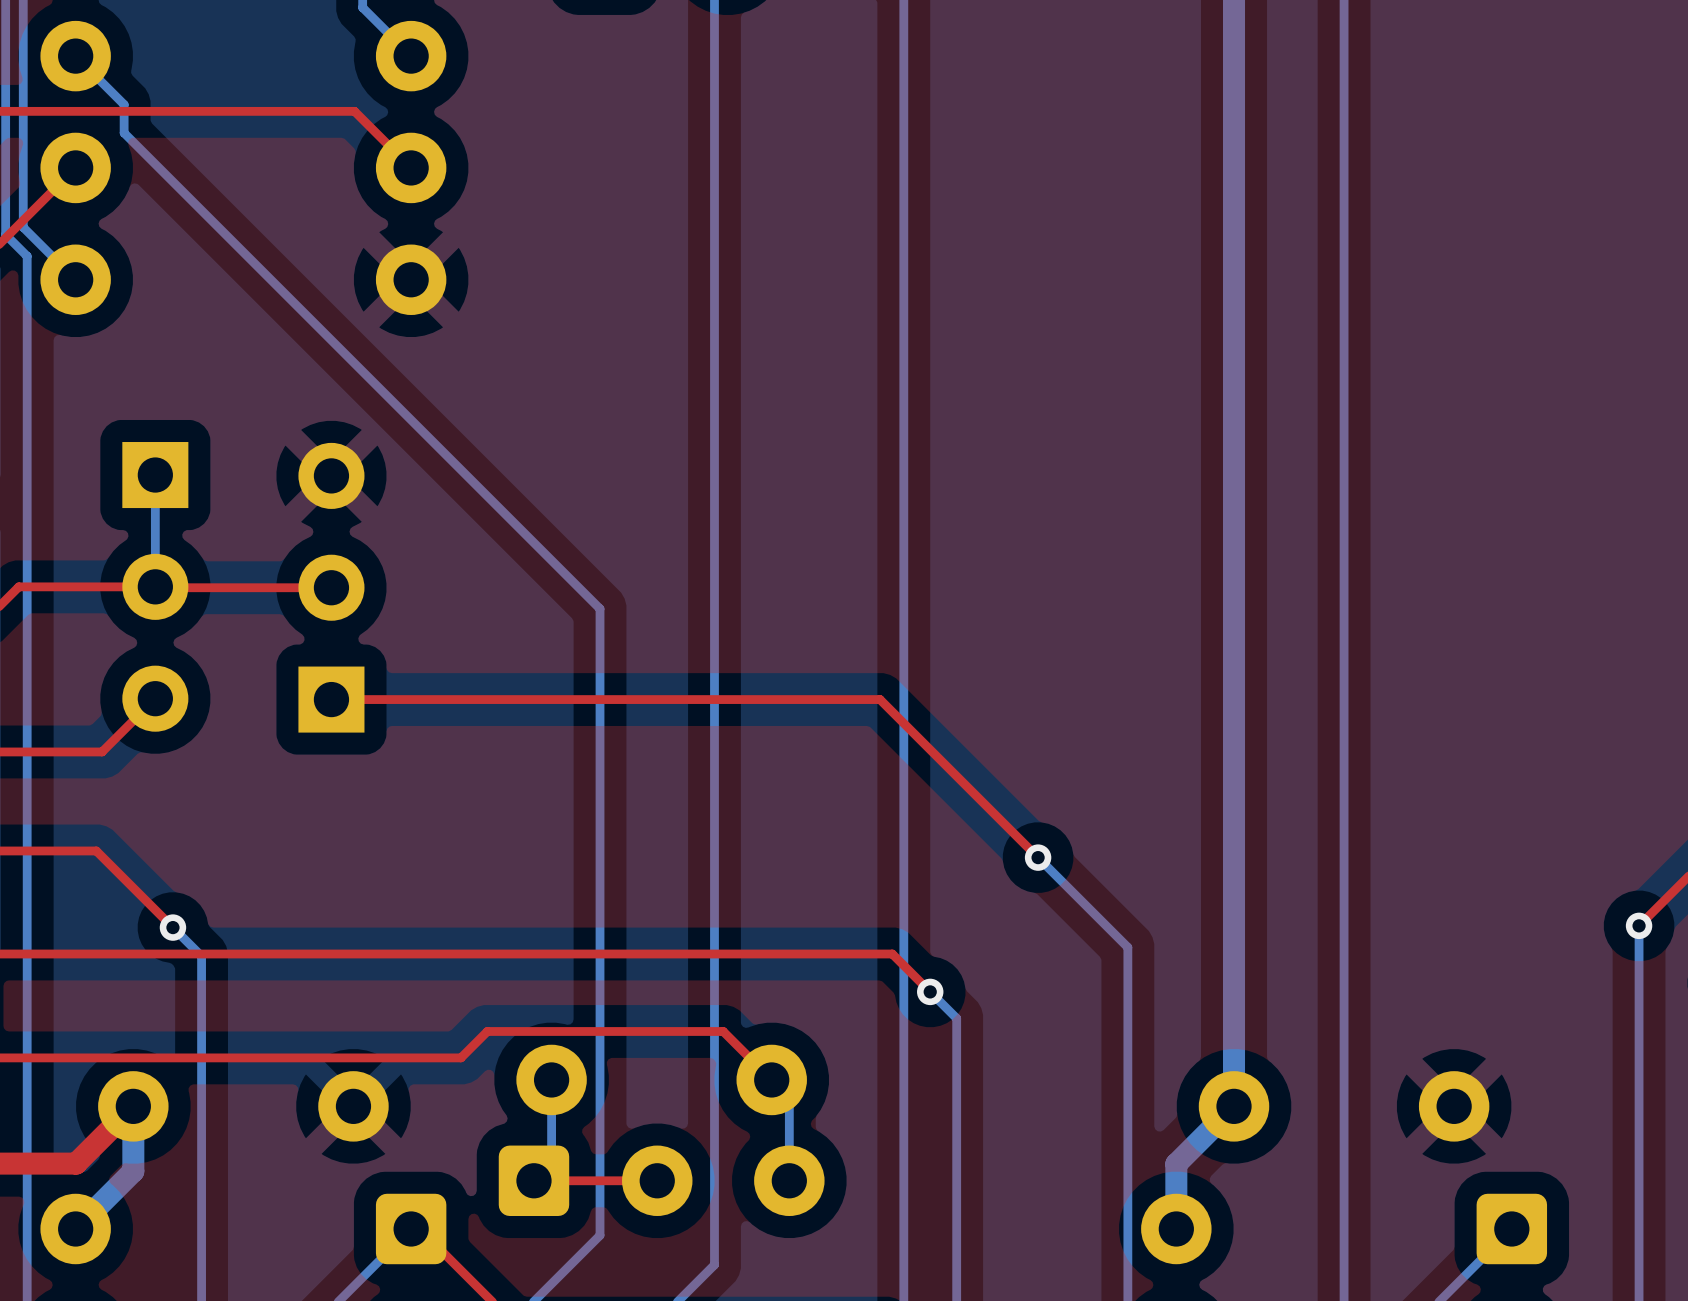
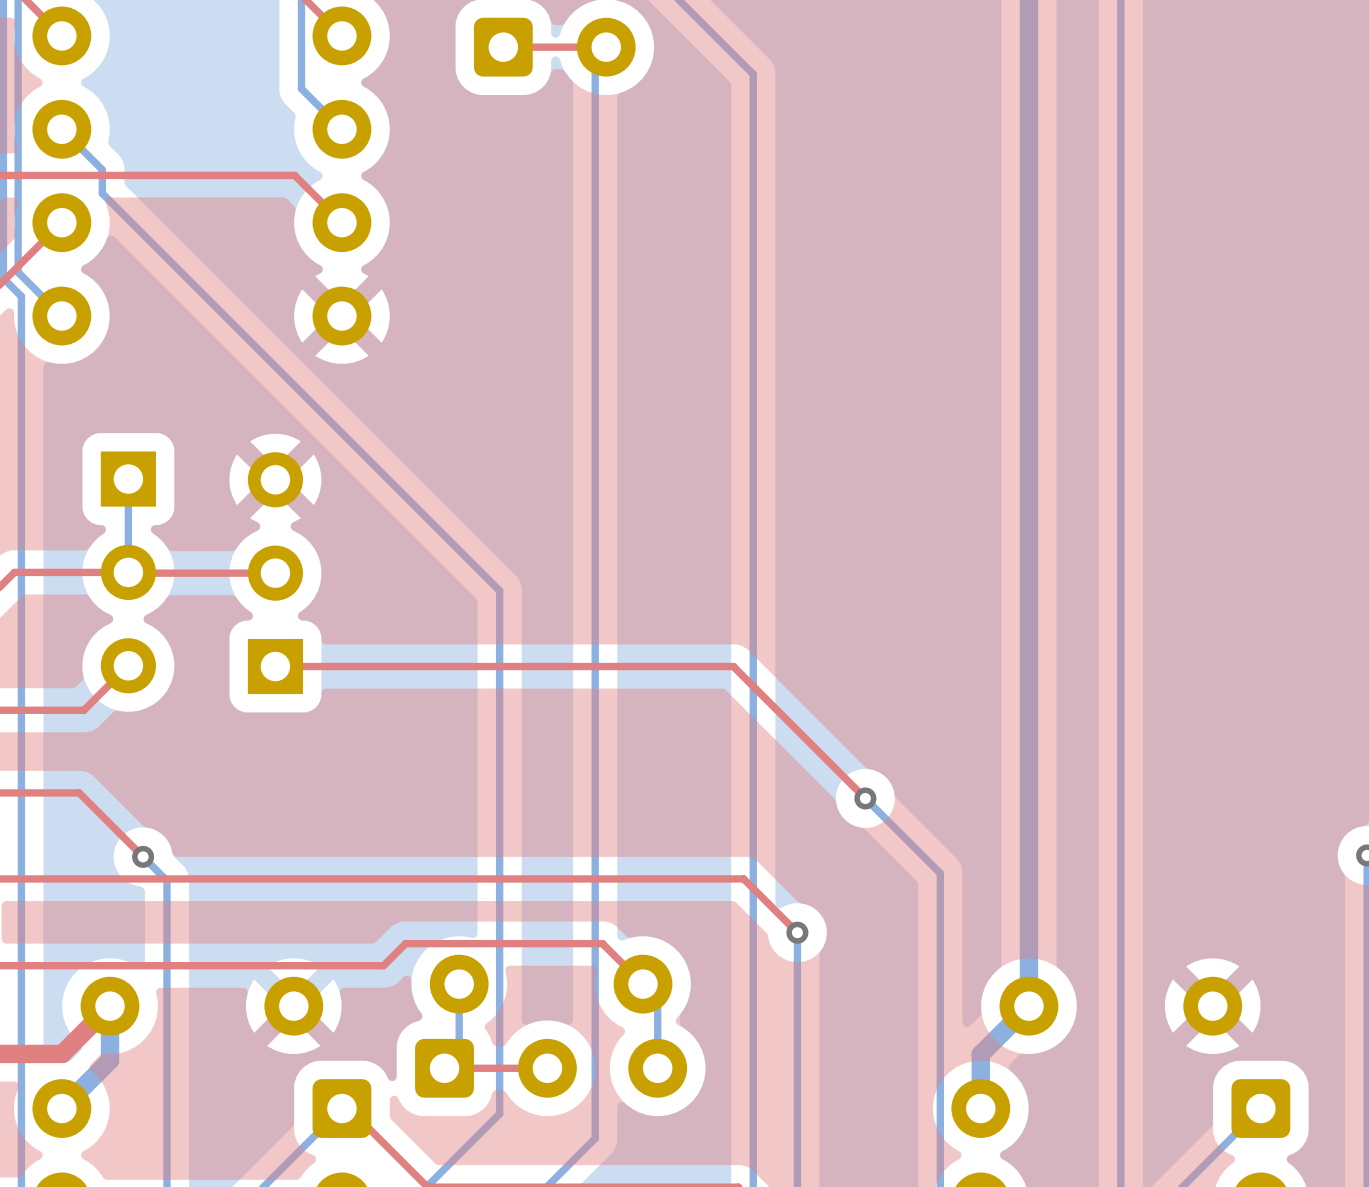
bottom track: (930, 991) (956, 1018) -> none
top track: none -> (775, 910) (797, 932)
via position: (930, 991) -> (797, 932)

